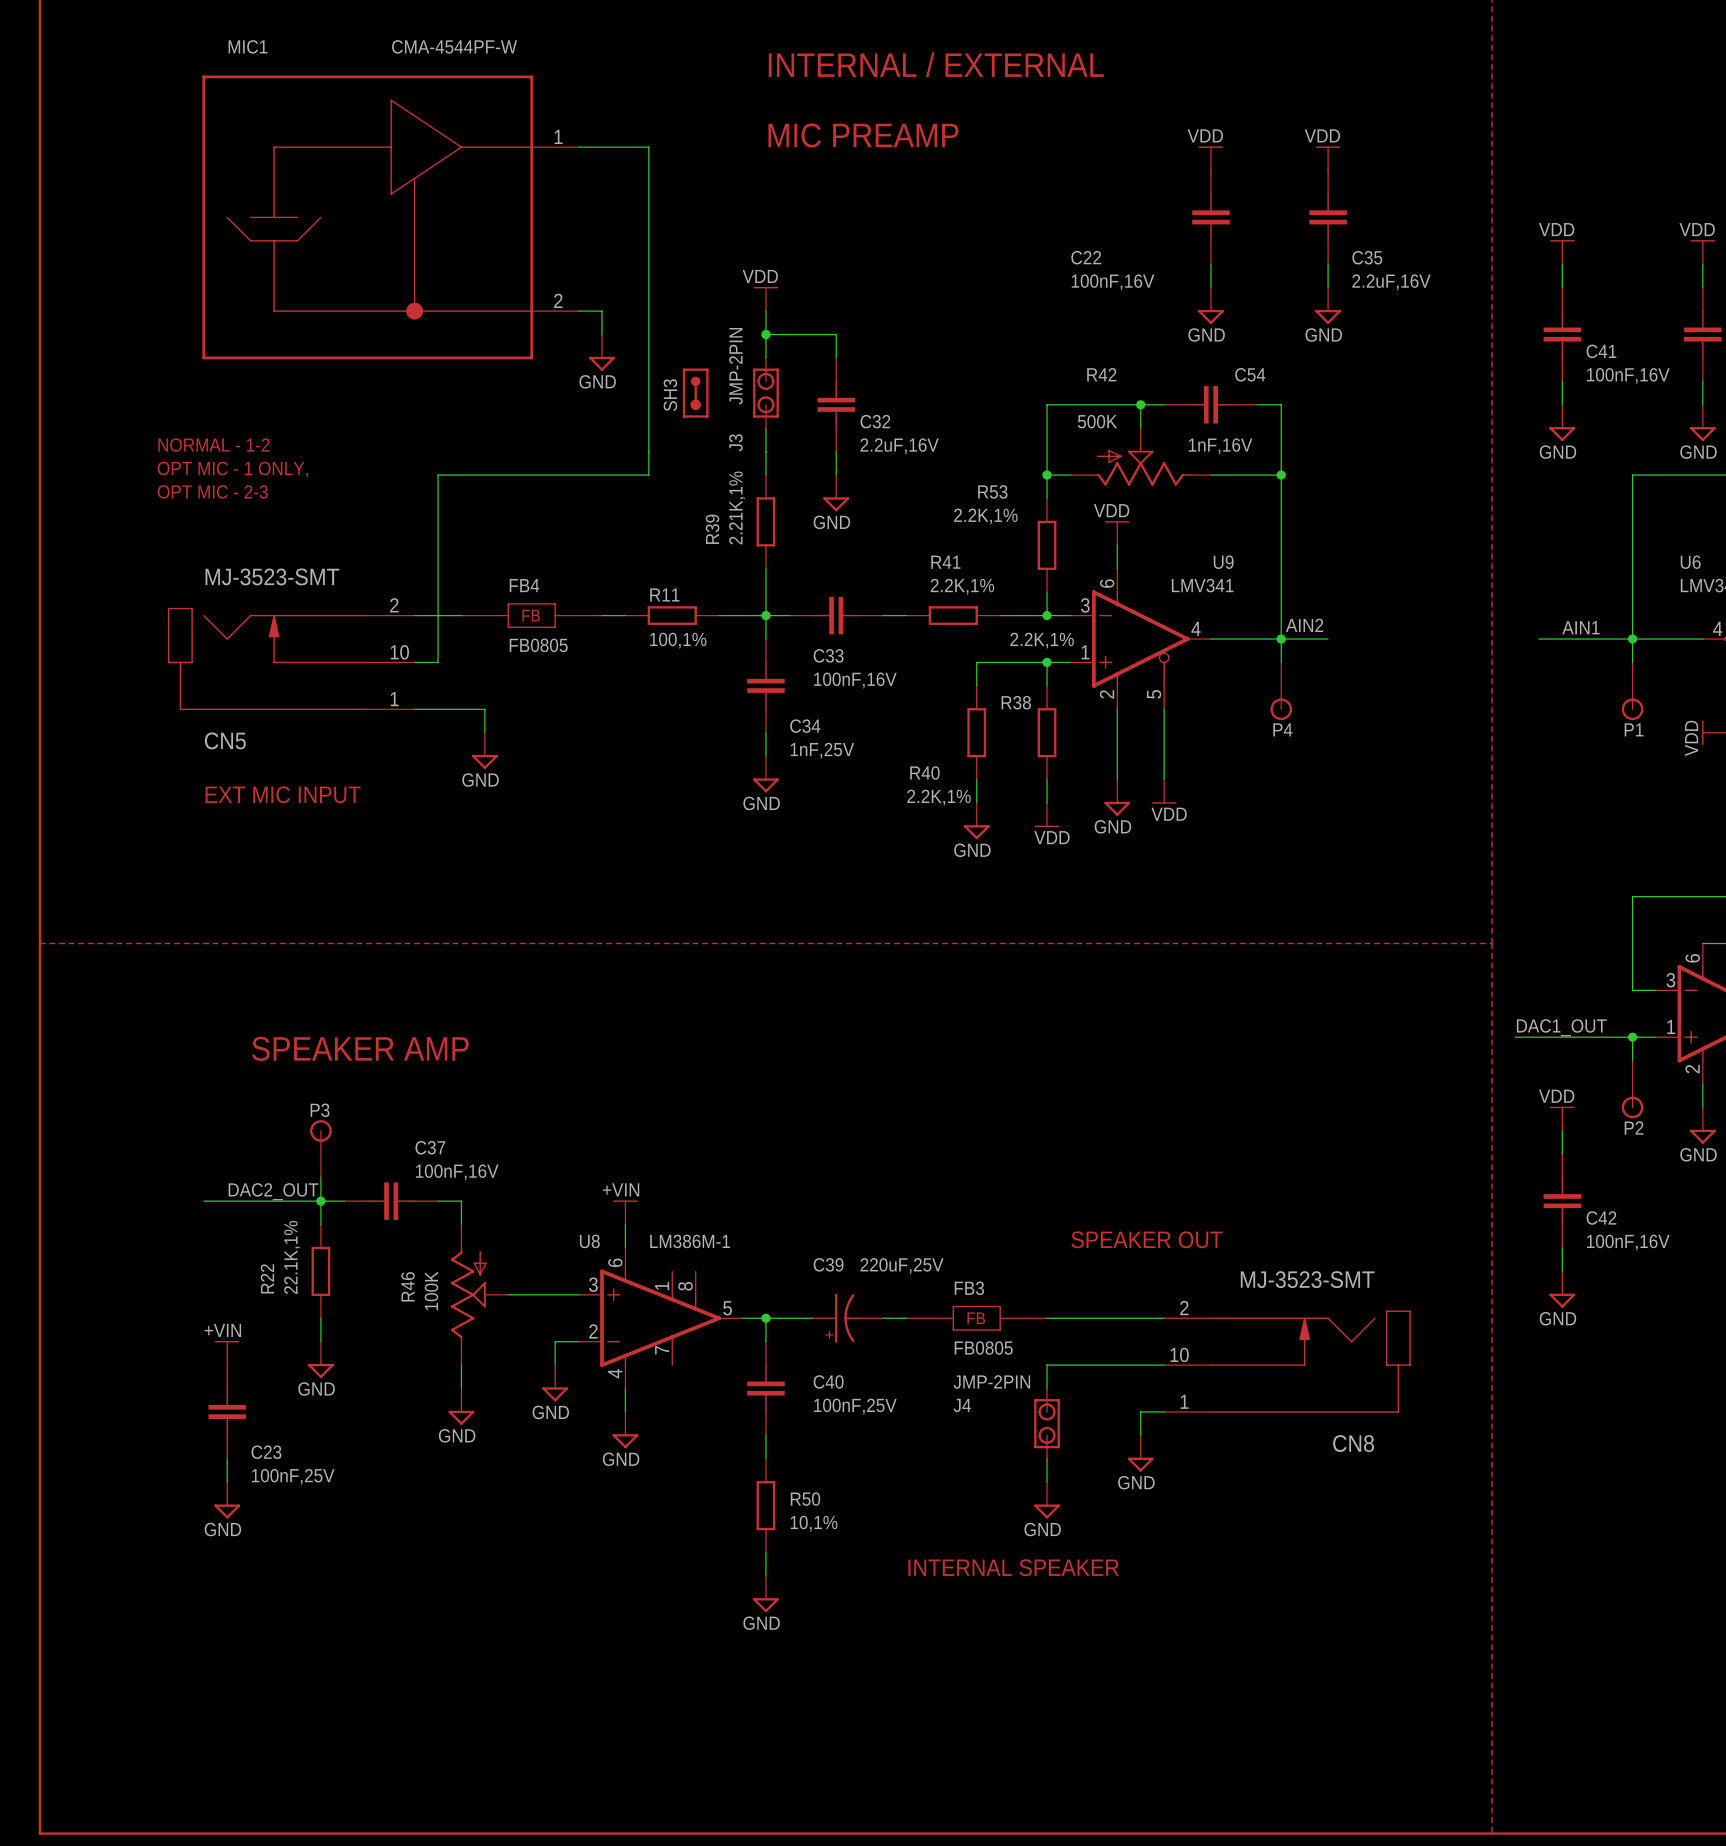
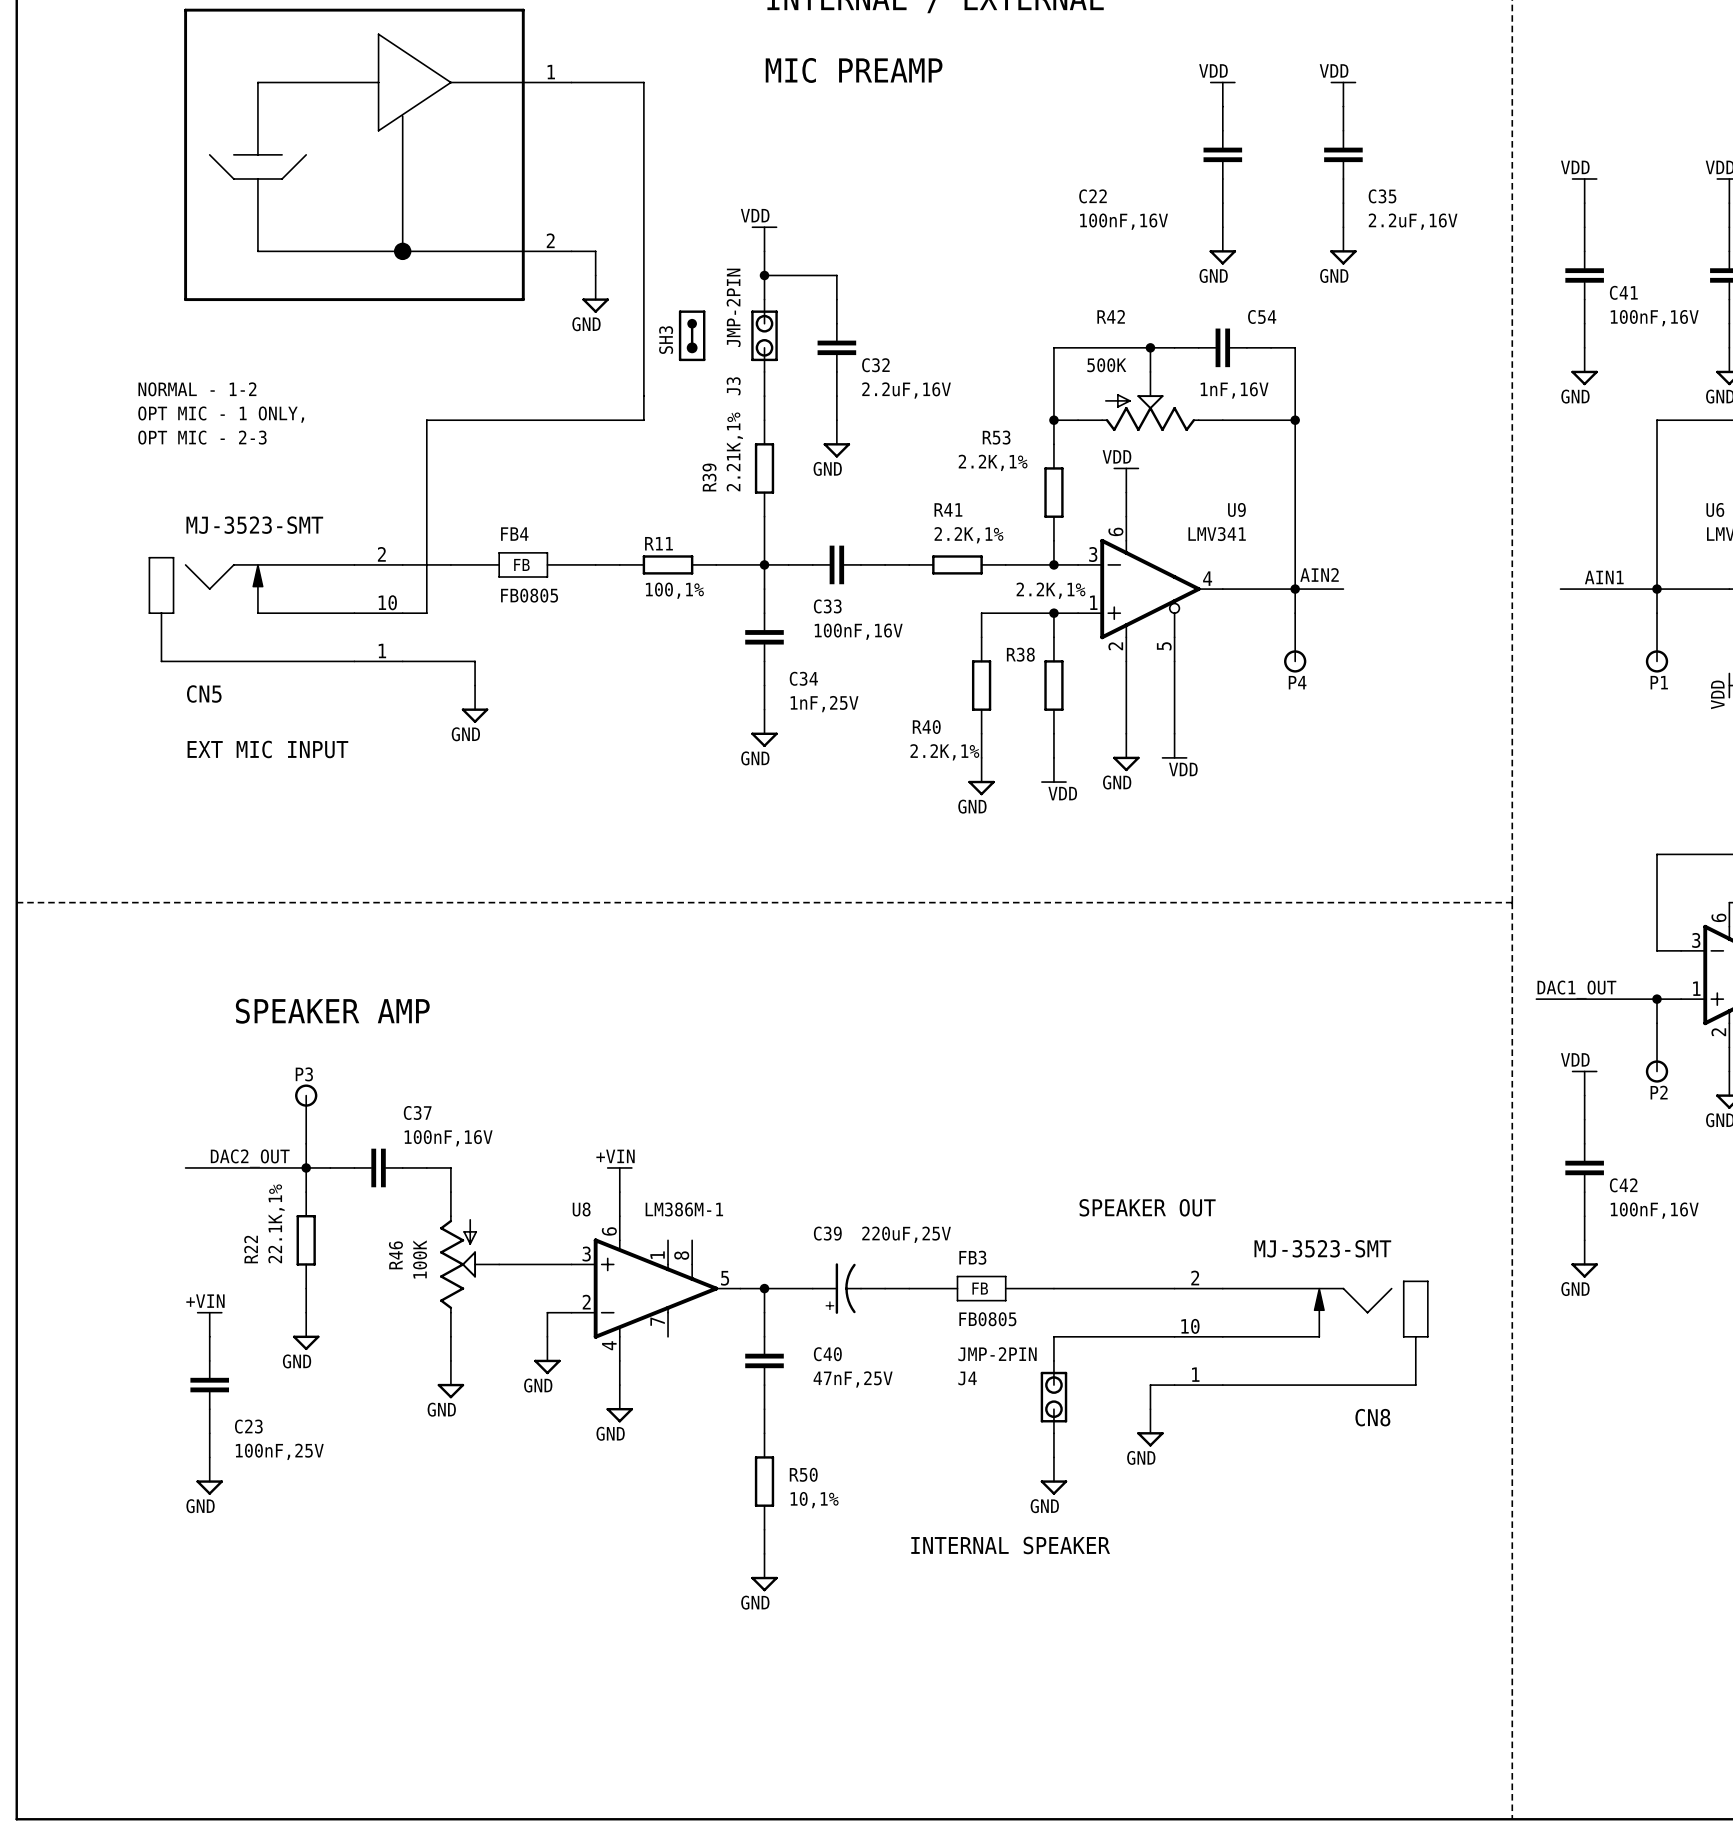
C40 value: 100nF,25V (855, 1406) -> 47nF,25V (853, 1379)

